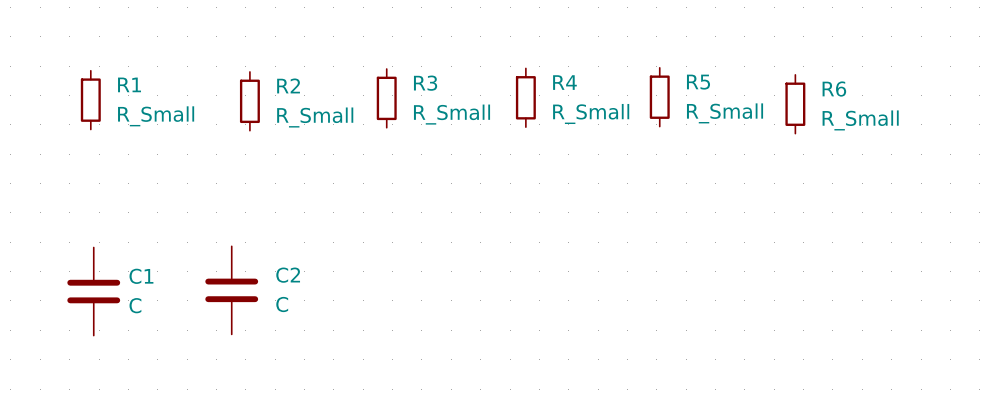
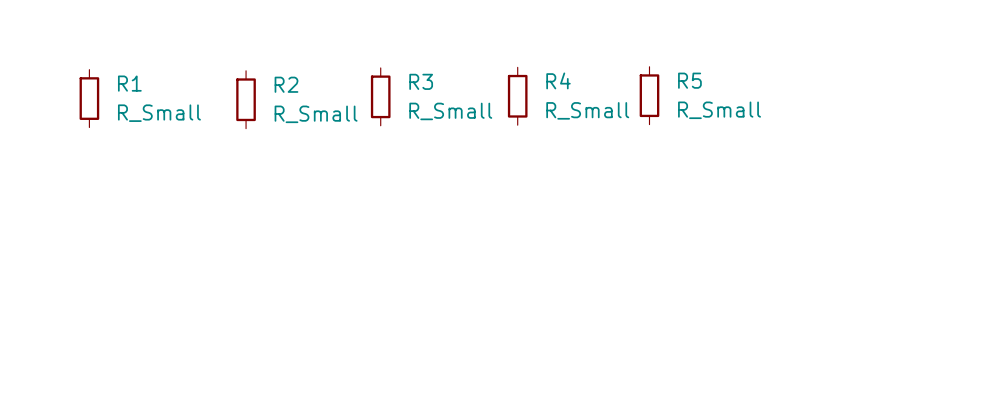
R6: R_Small (795, 104) -> none
C2: C (231, 290) -> none
C1: C (93, 291) -> none

